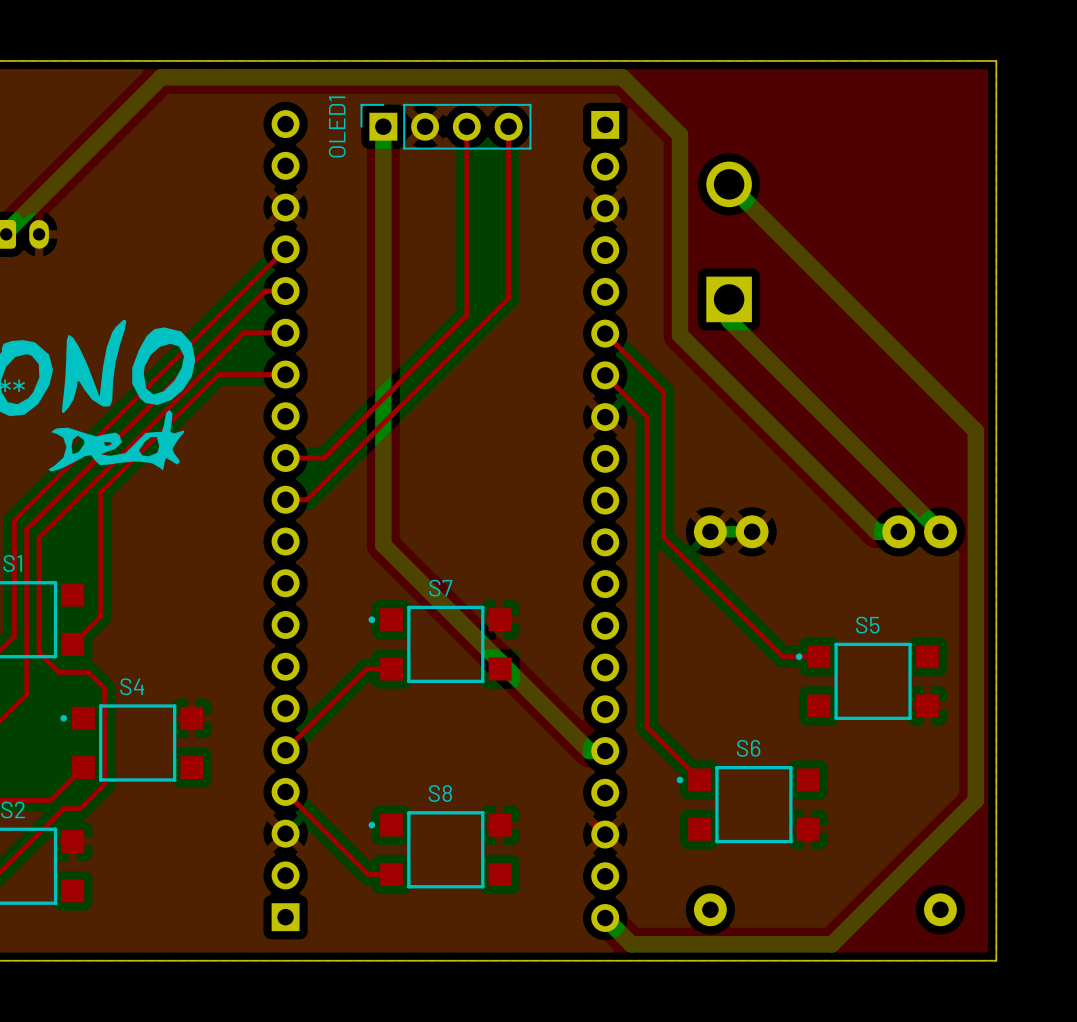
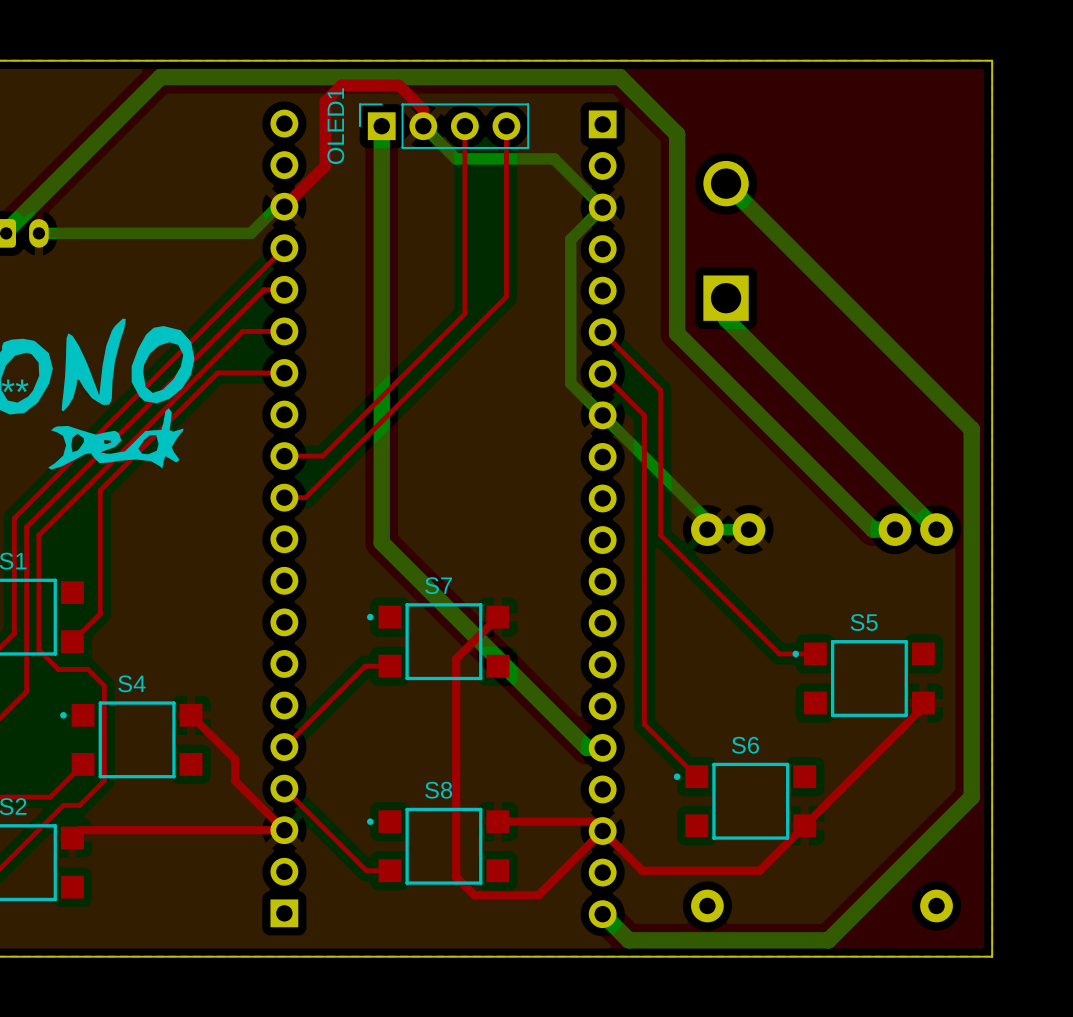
top track: none -> (423, 126) (423, 109) (398, 85) (341, 85) (325, 101) (325, 165) (284, 206)
bottom track: none -> (423, 126) (456, 158) (554, 158) (602, 207) (570, 239) (570, 383) (707, 520)
bottom track: none -> (277, 206) (250, 233) (38, 233)
top track: none -> (497, 617) (456, 658) (456, 876) (474, 895) (538, 895) (602, 831) (642, 870) (759, 870) (923, 707)
top track: none -> (191, 715) (235, 759) (235, 781) (284, 830) (80, 830)
top track: none -> (497, 821) (593, 821)

